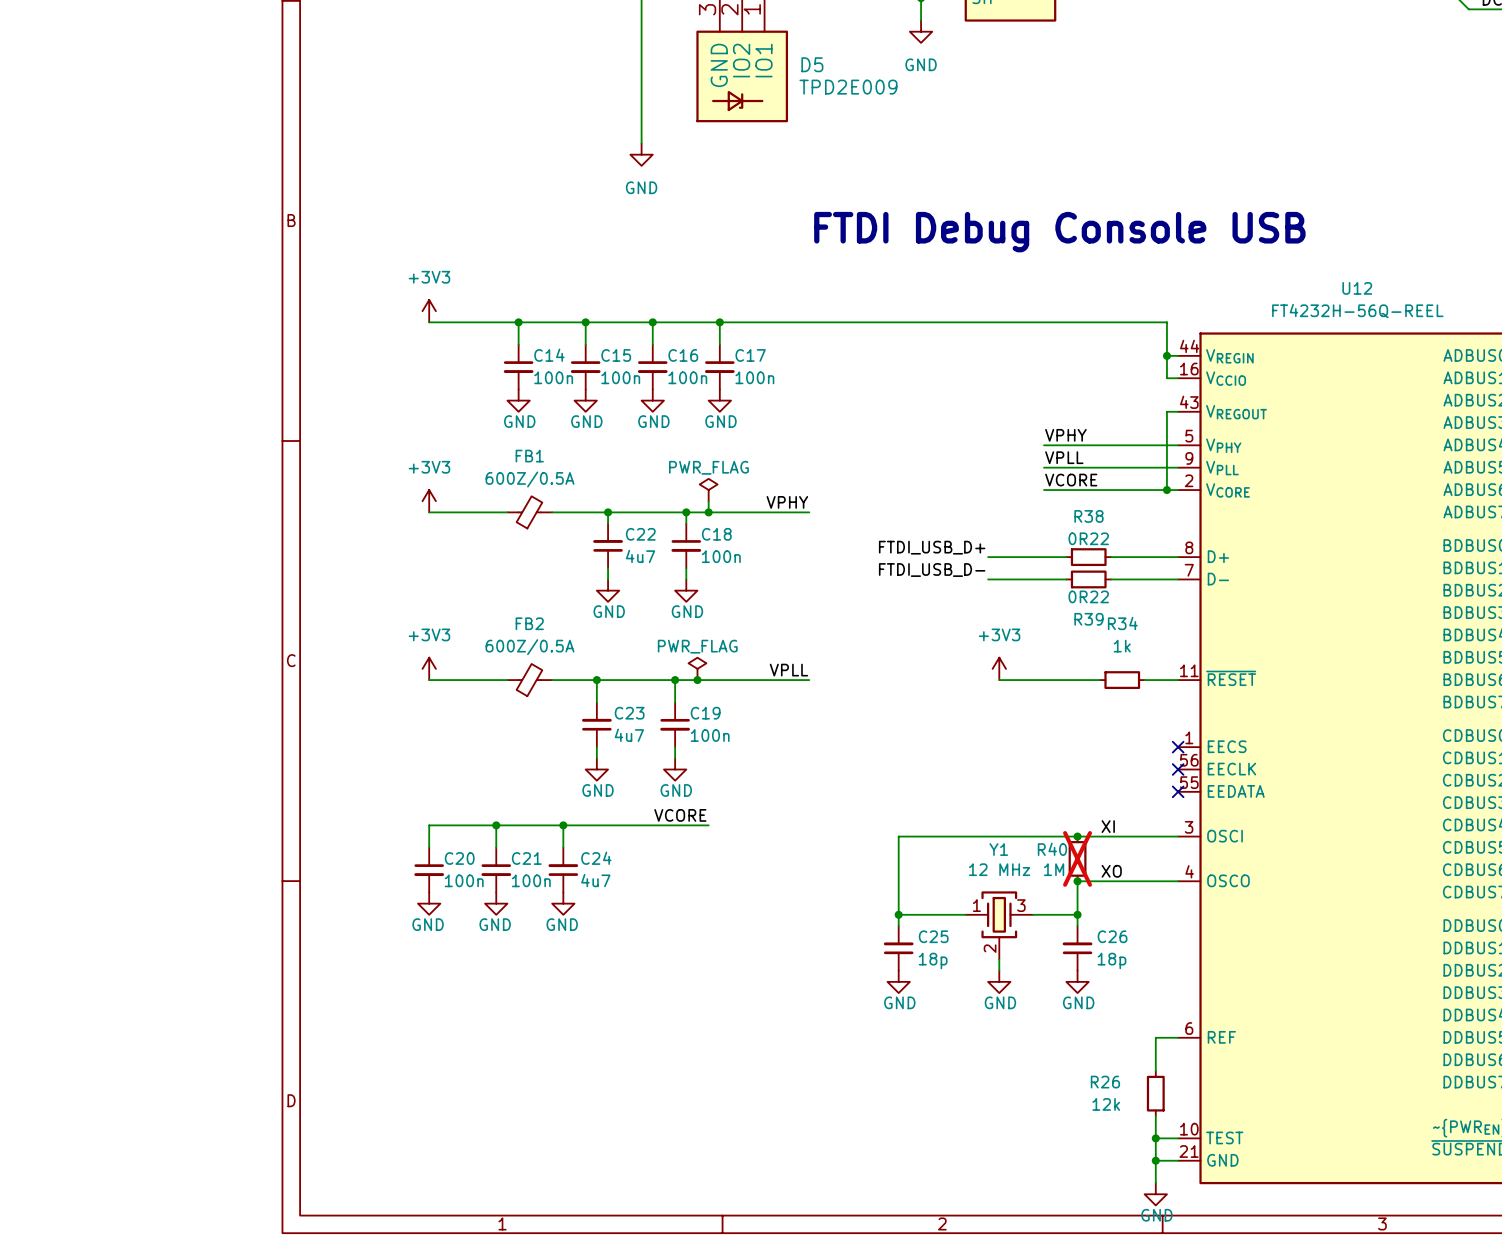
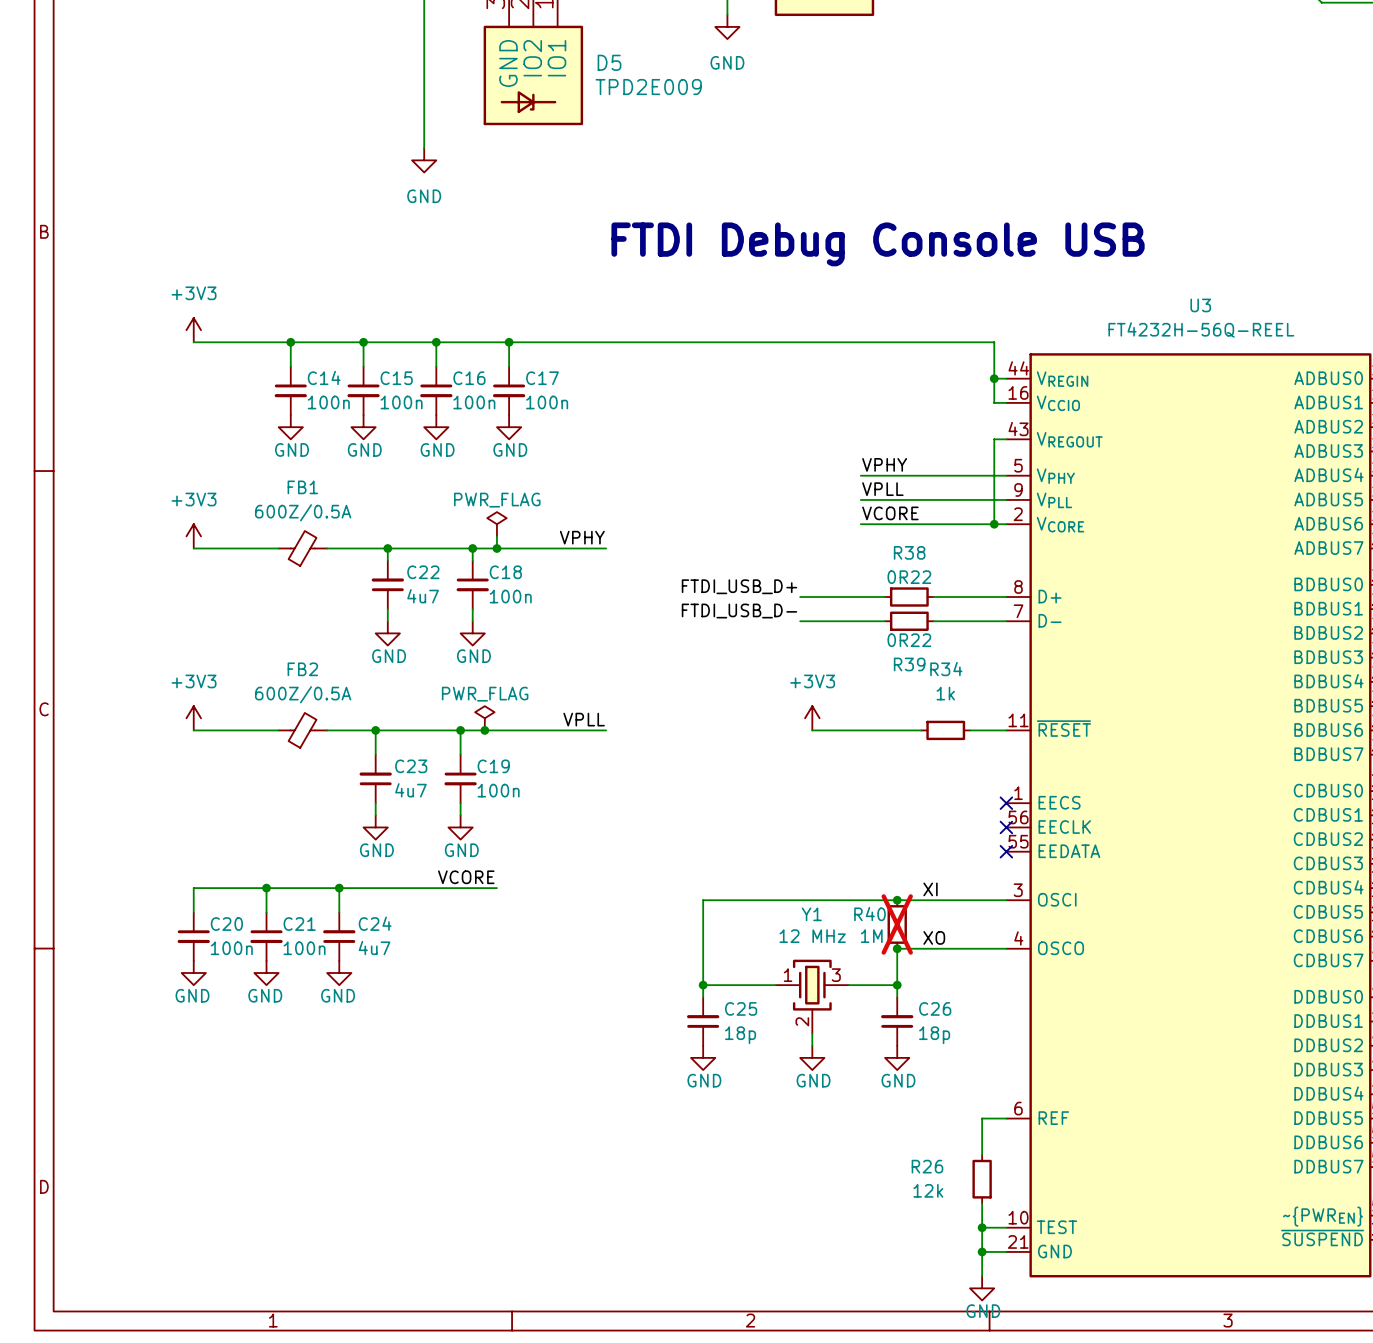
U12 name: U12 (1357, 288) -> U3 (1200, 305)

